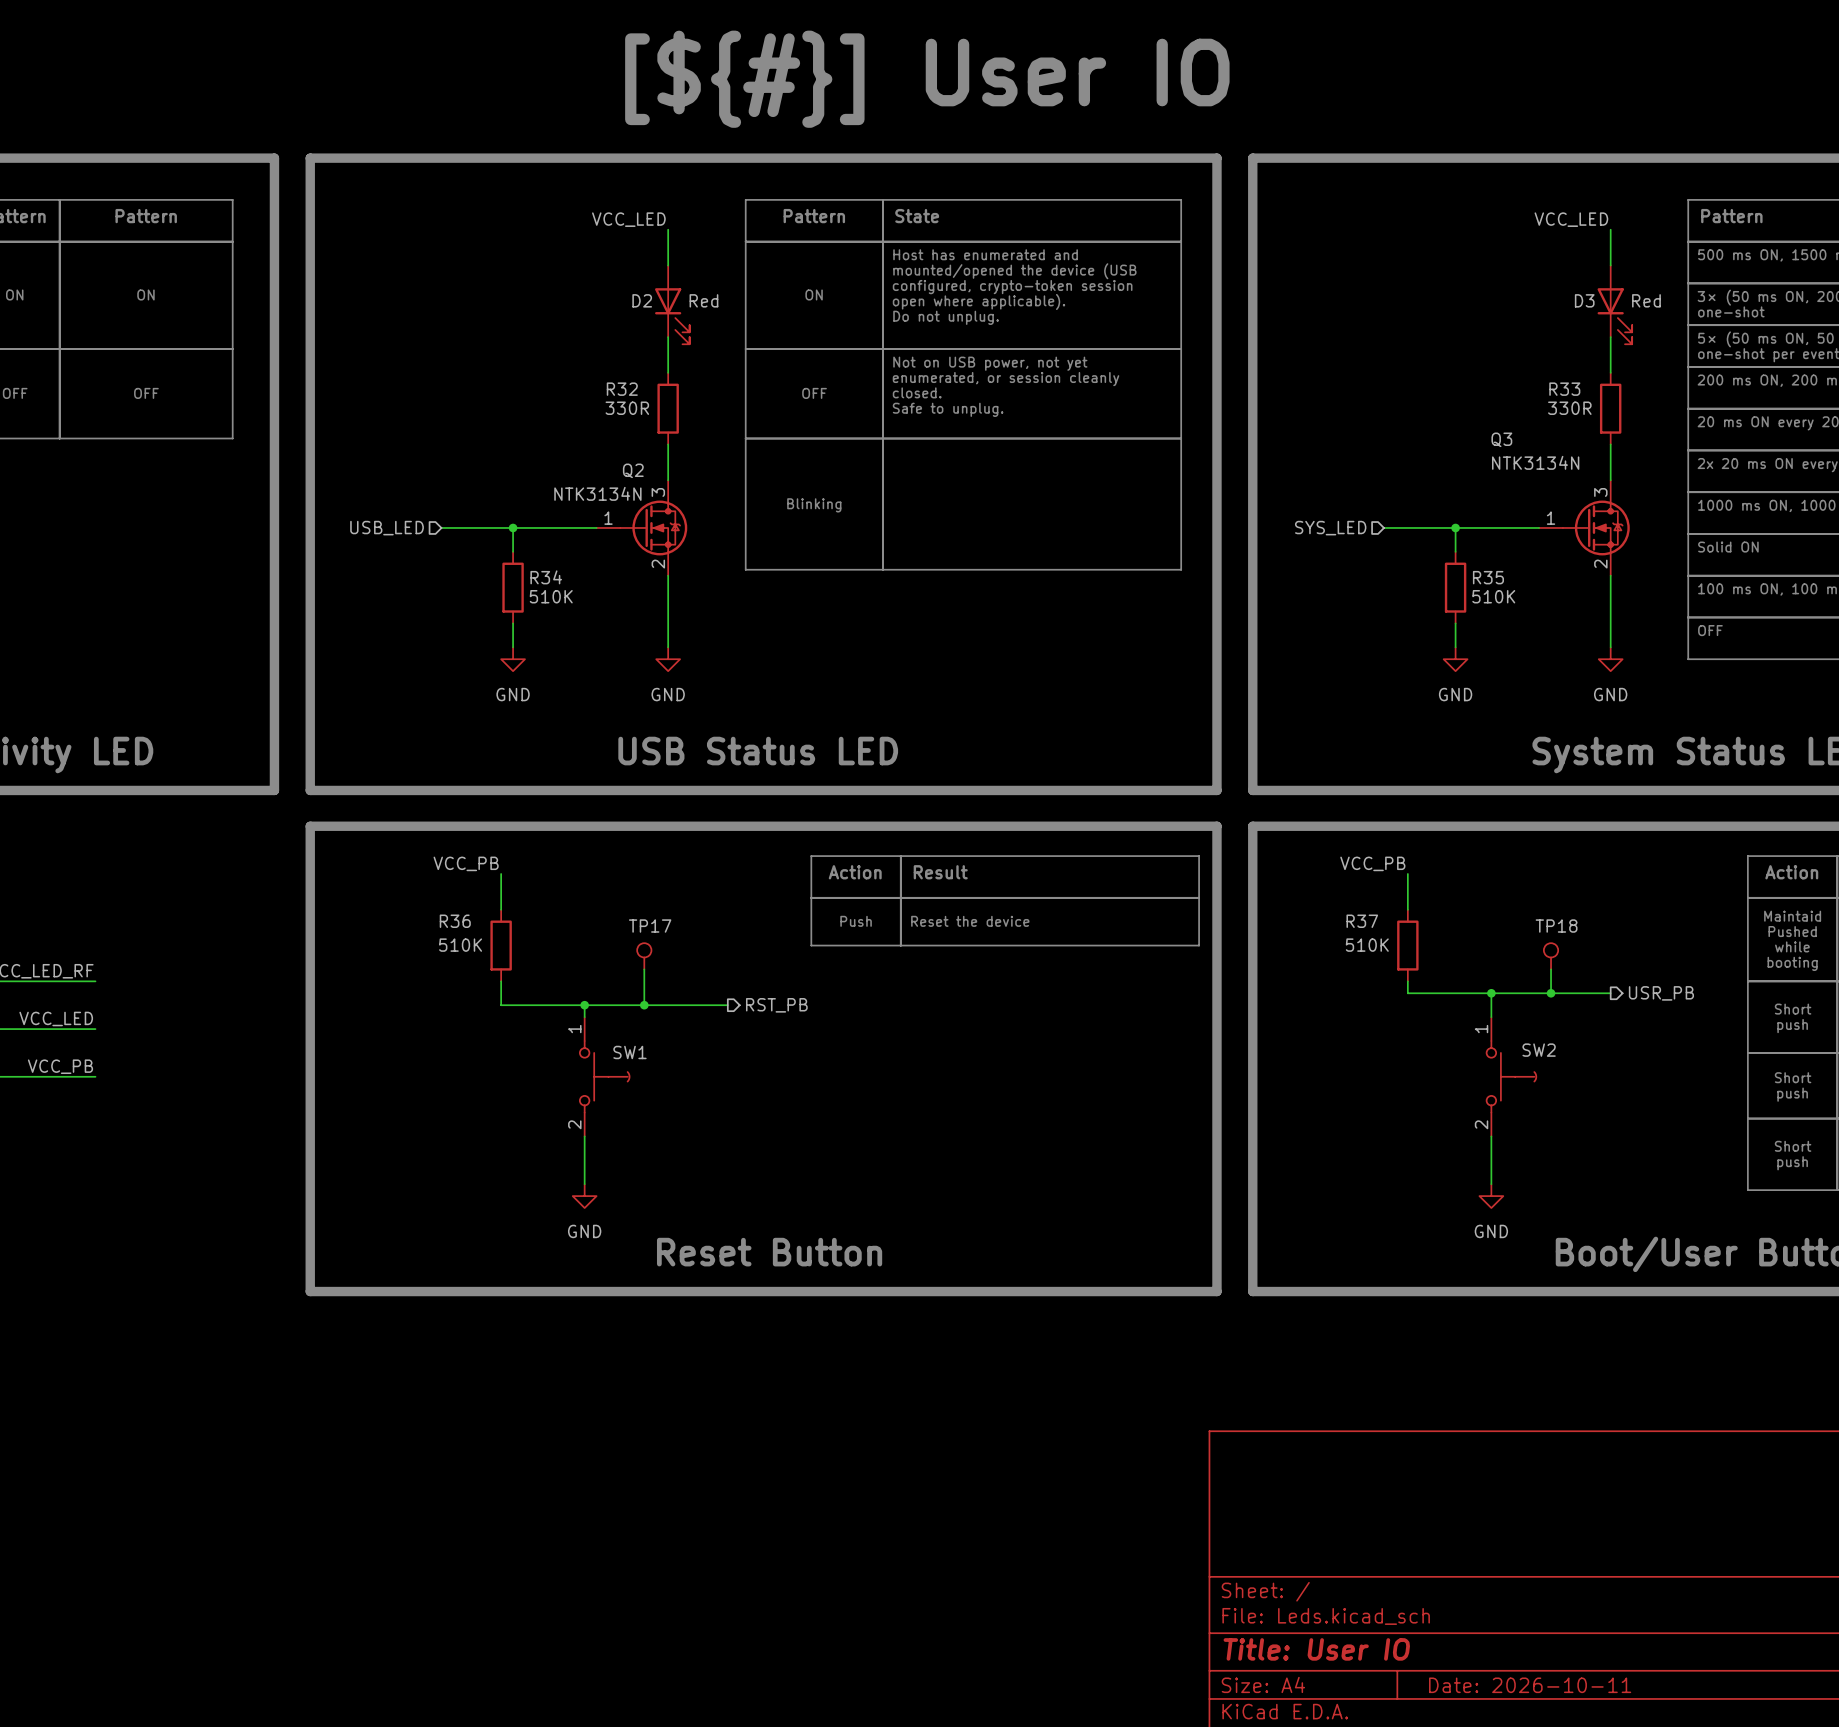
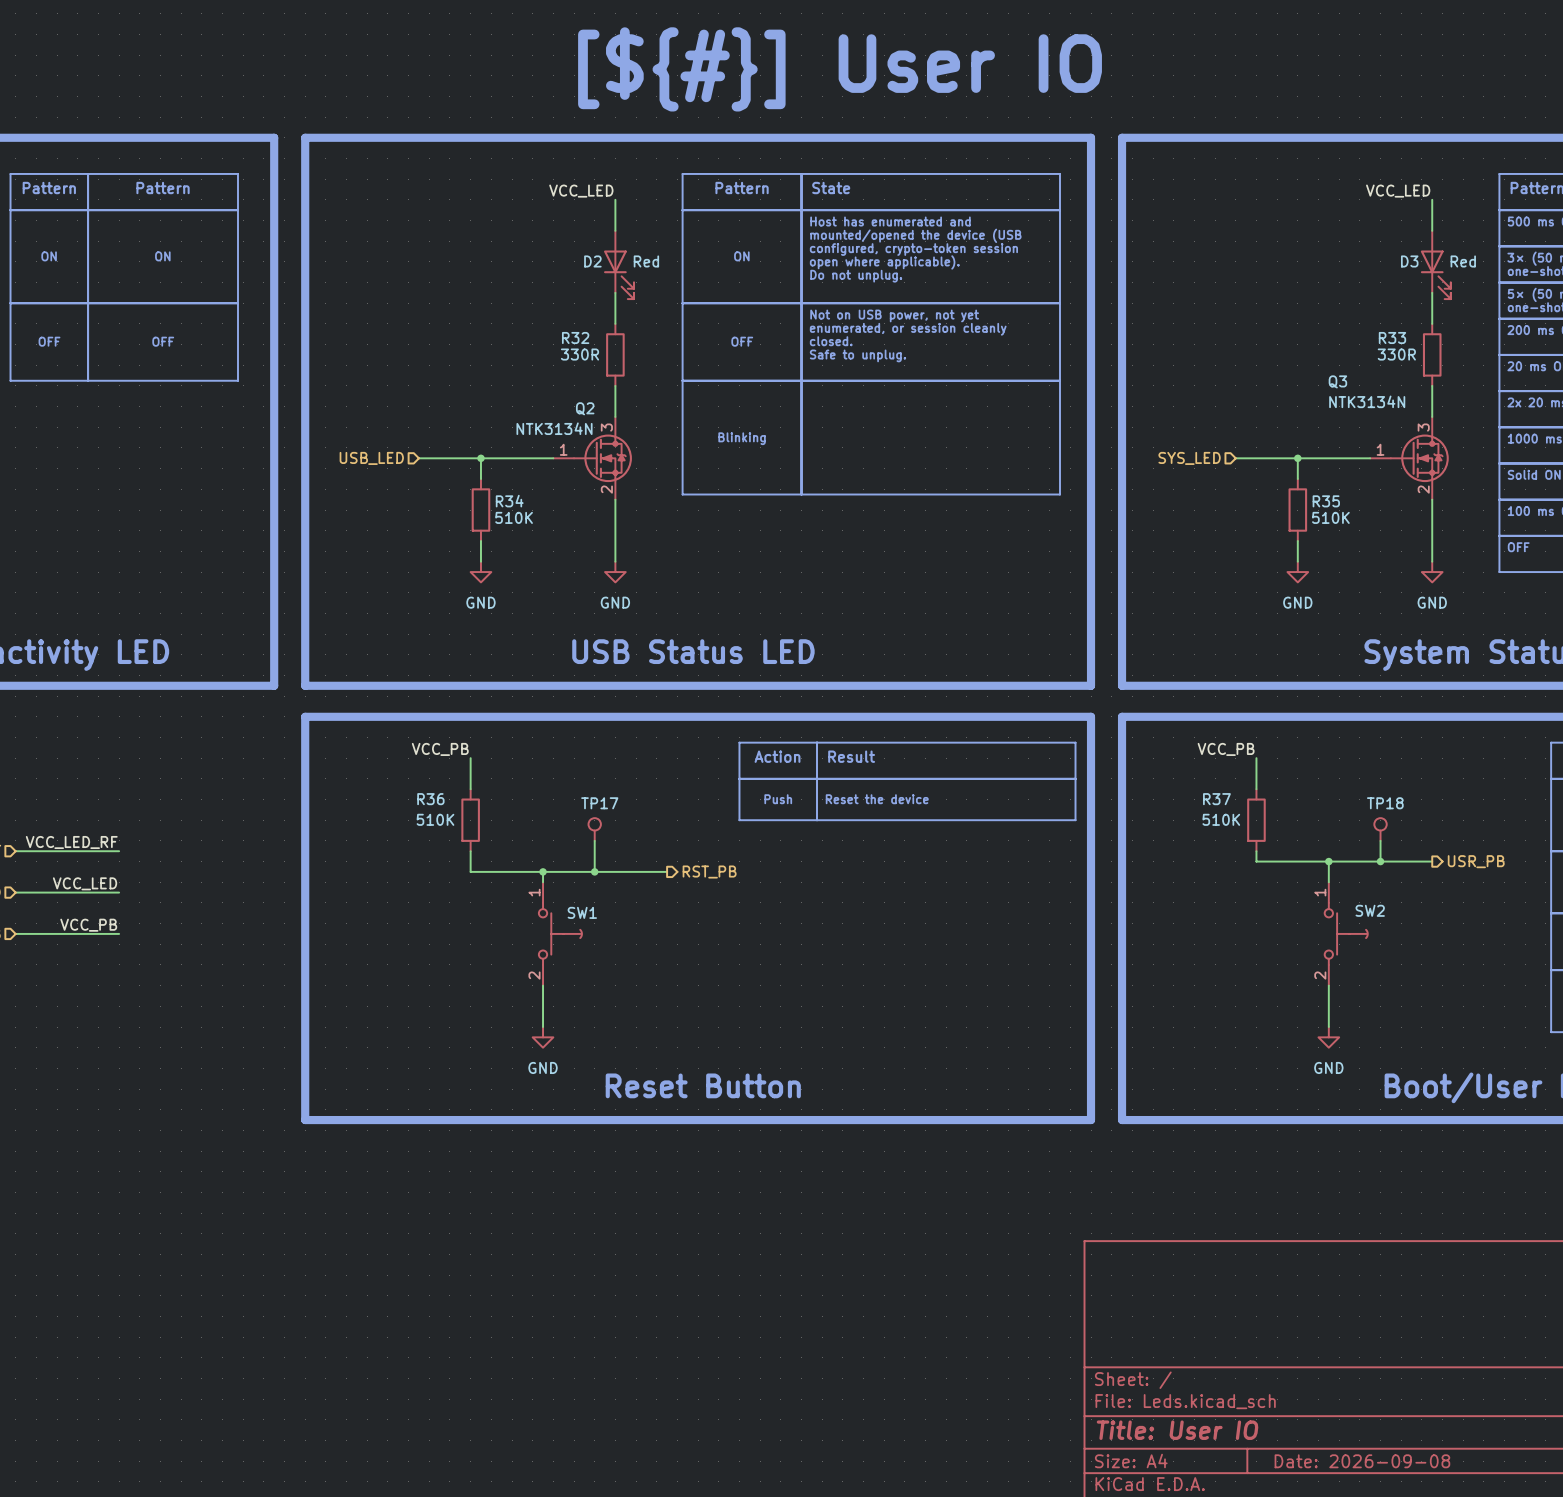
title block: Date: 2026-10-11 (1530, 1685) -> Date: 2026-09-08 (1362, 1461)

